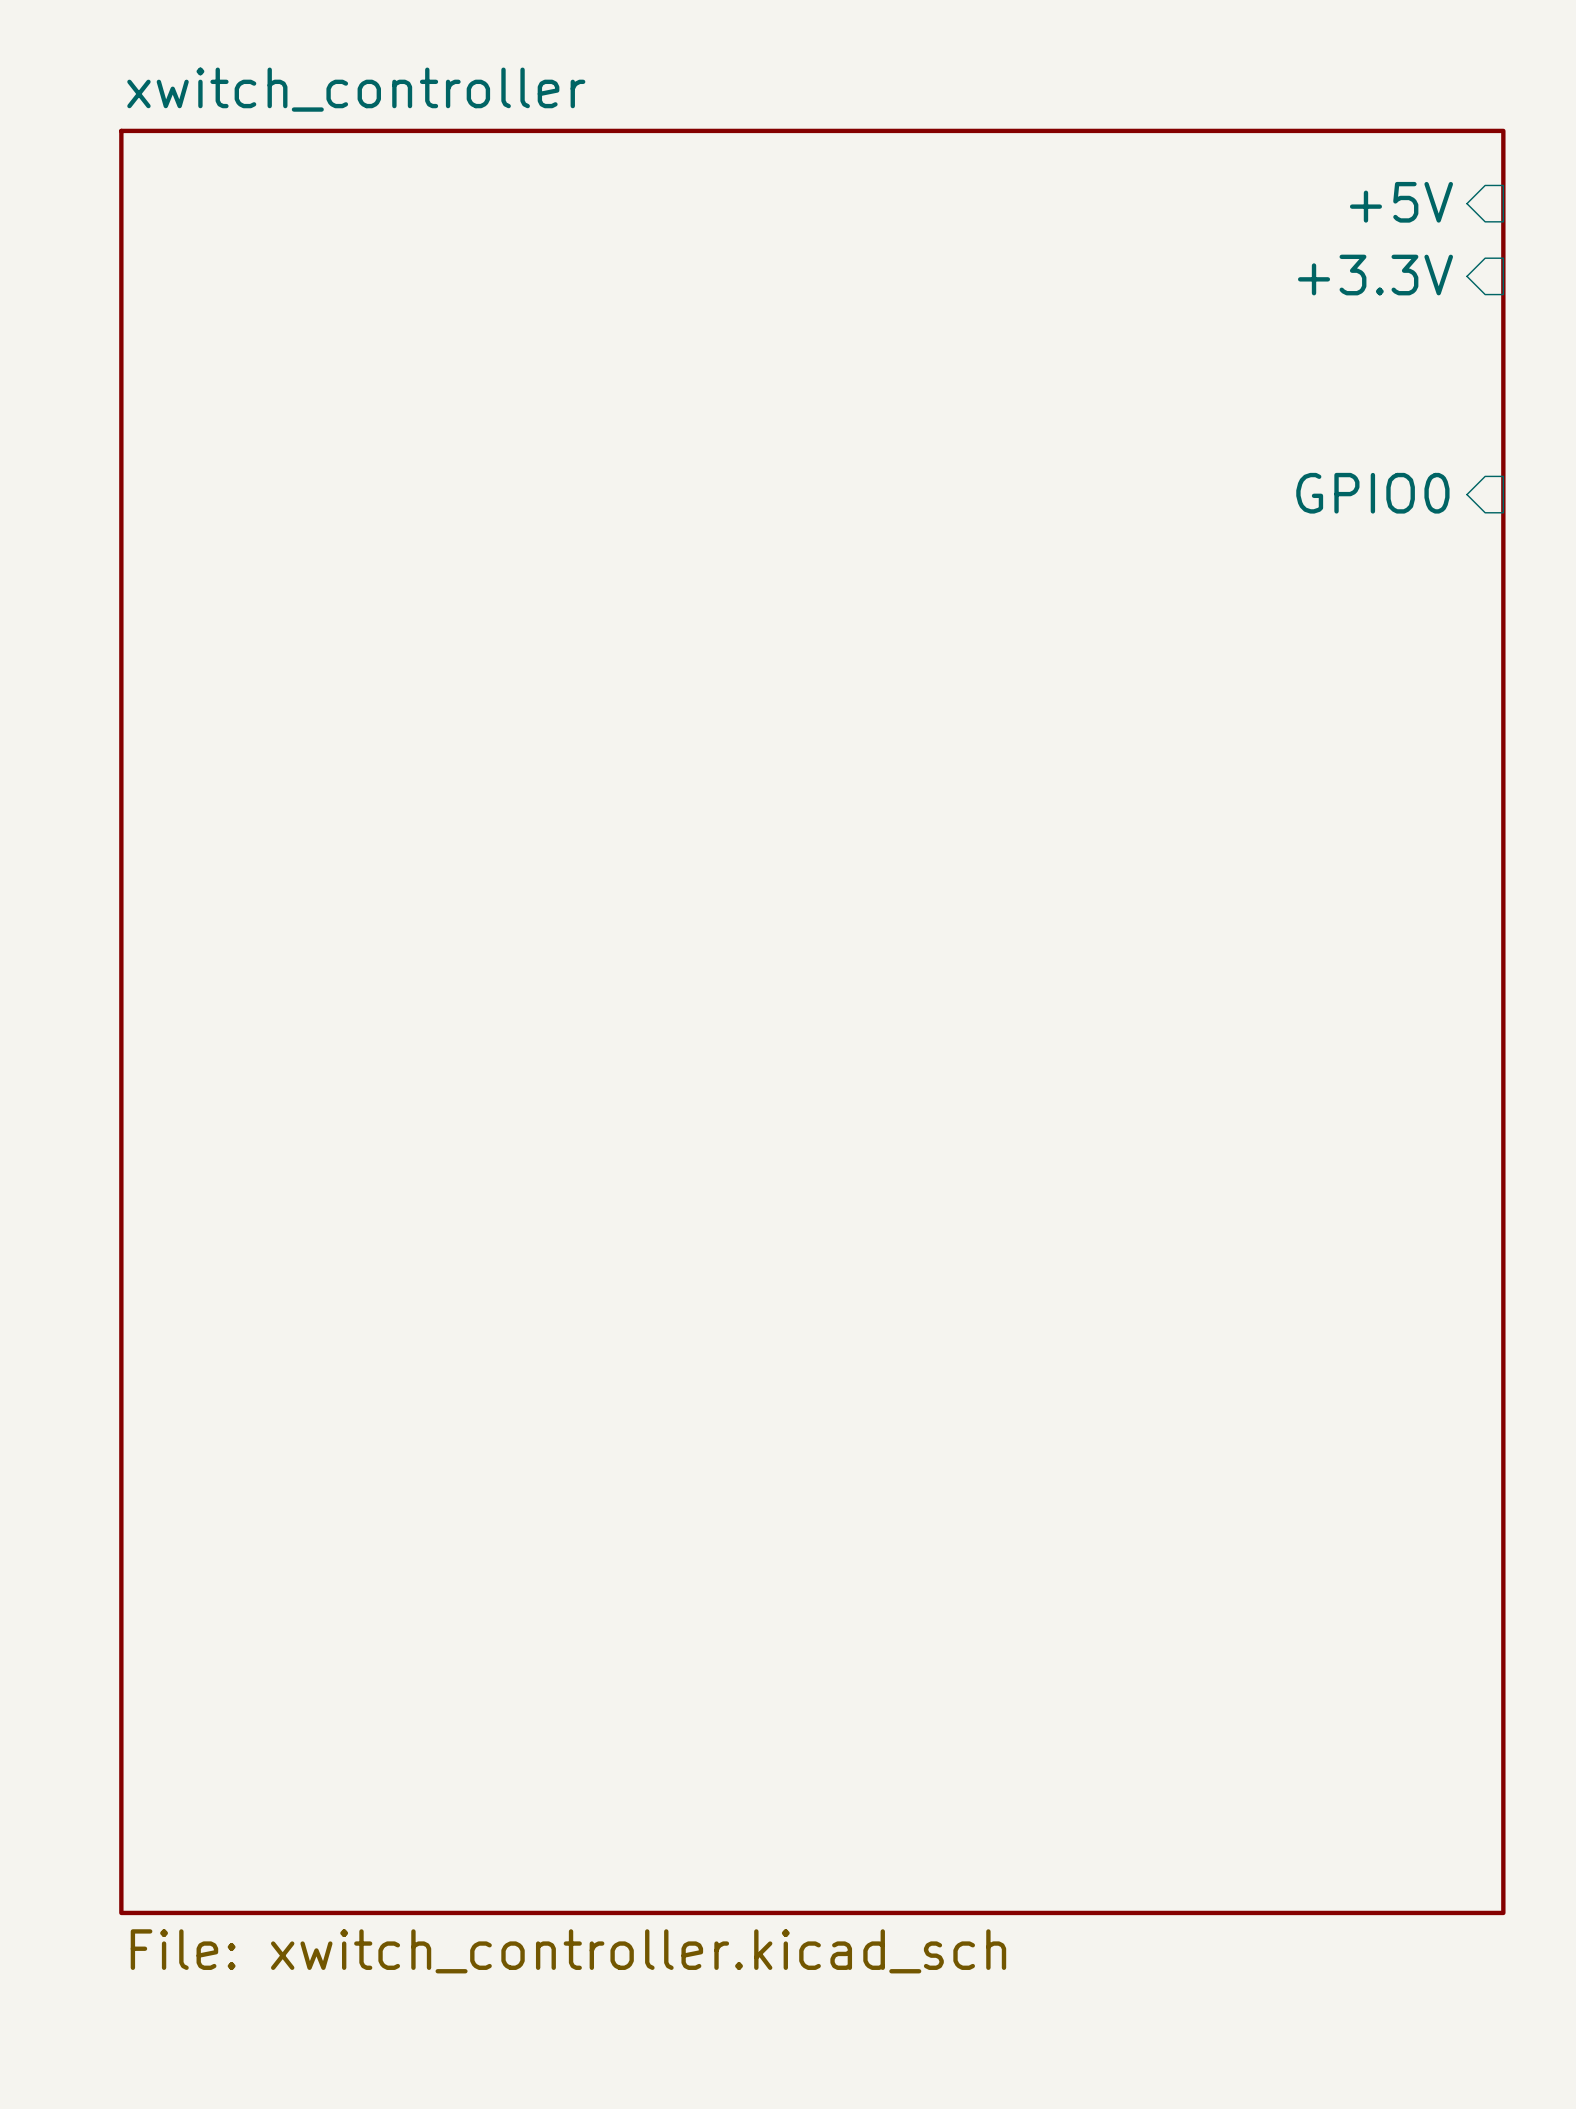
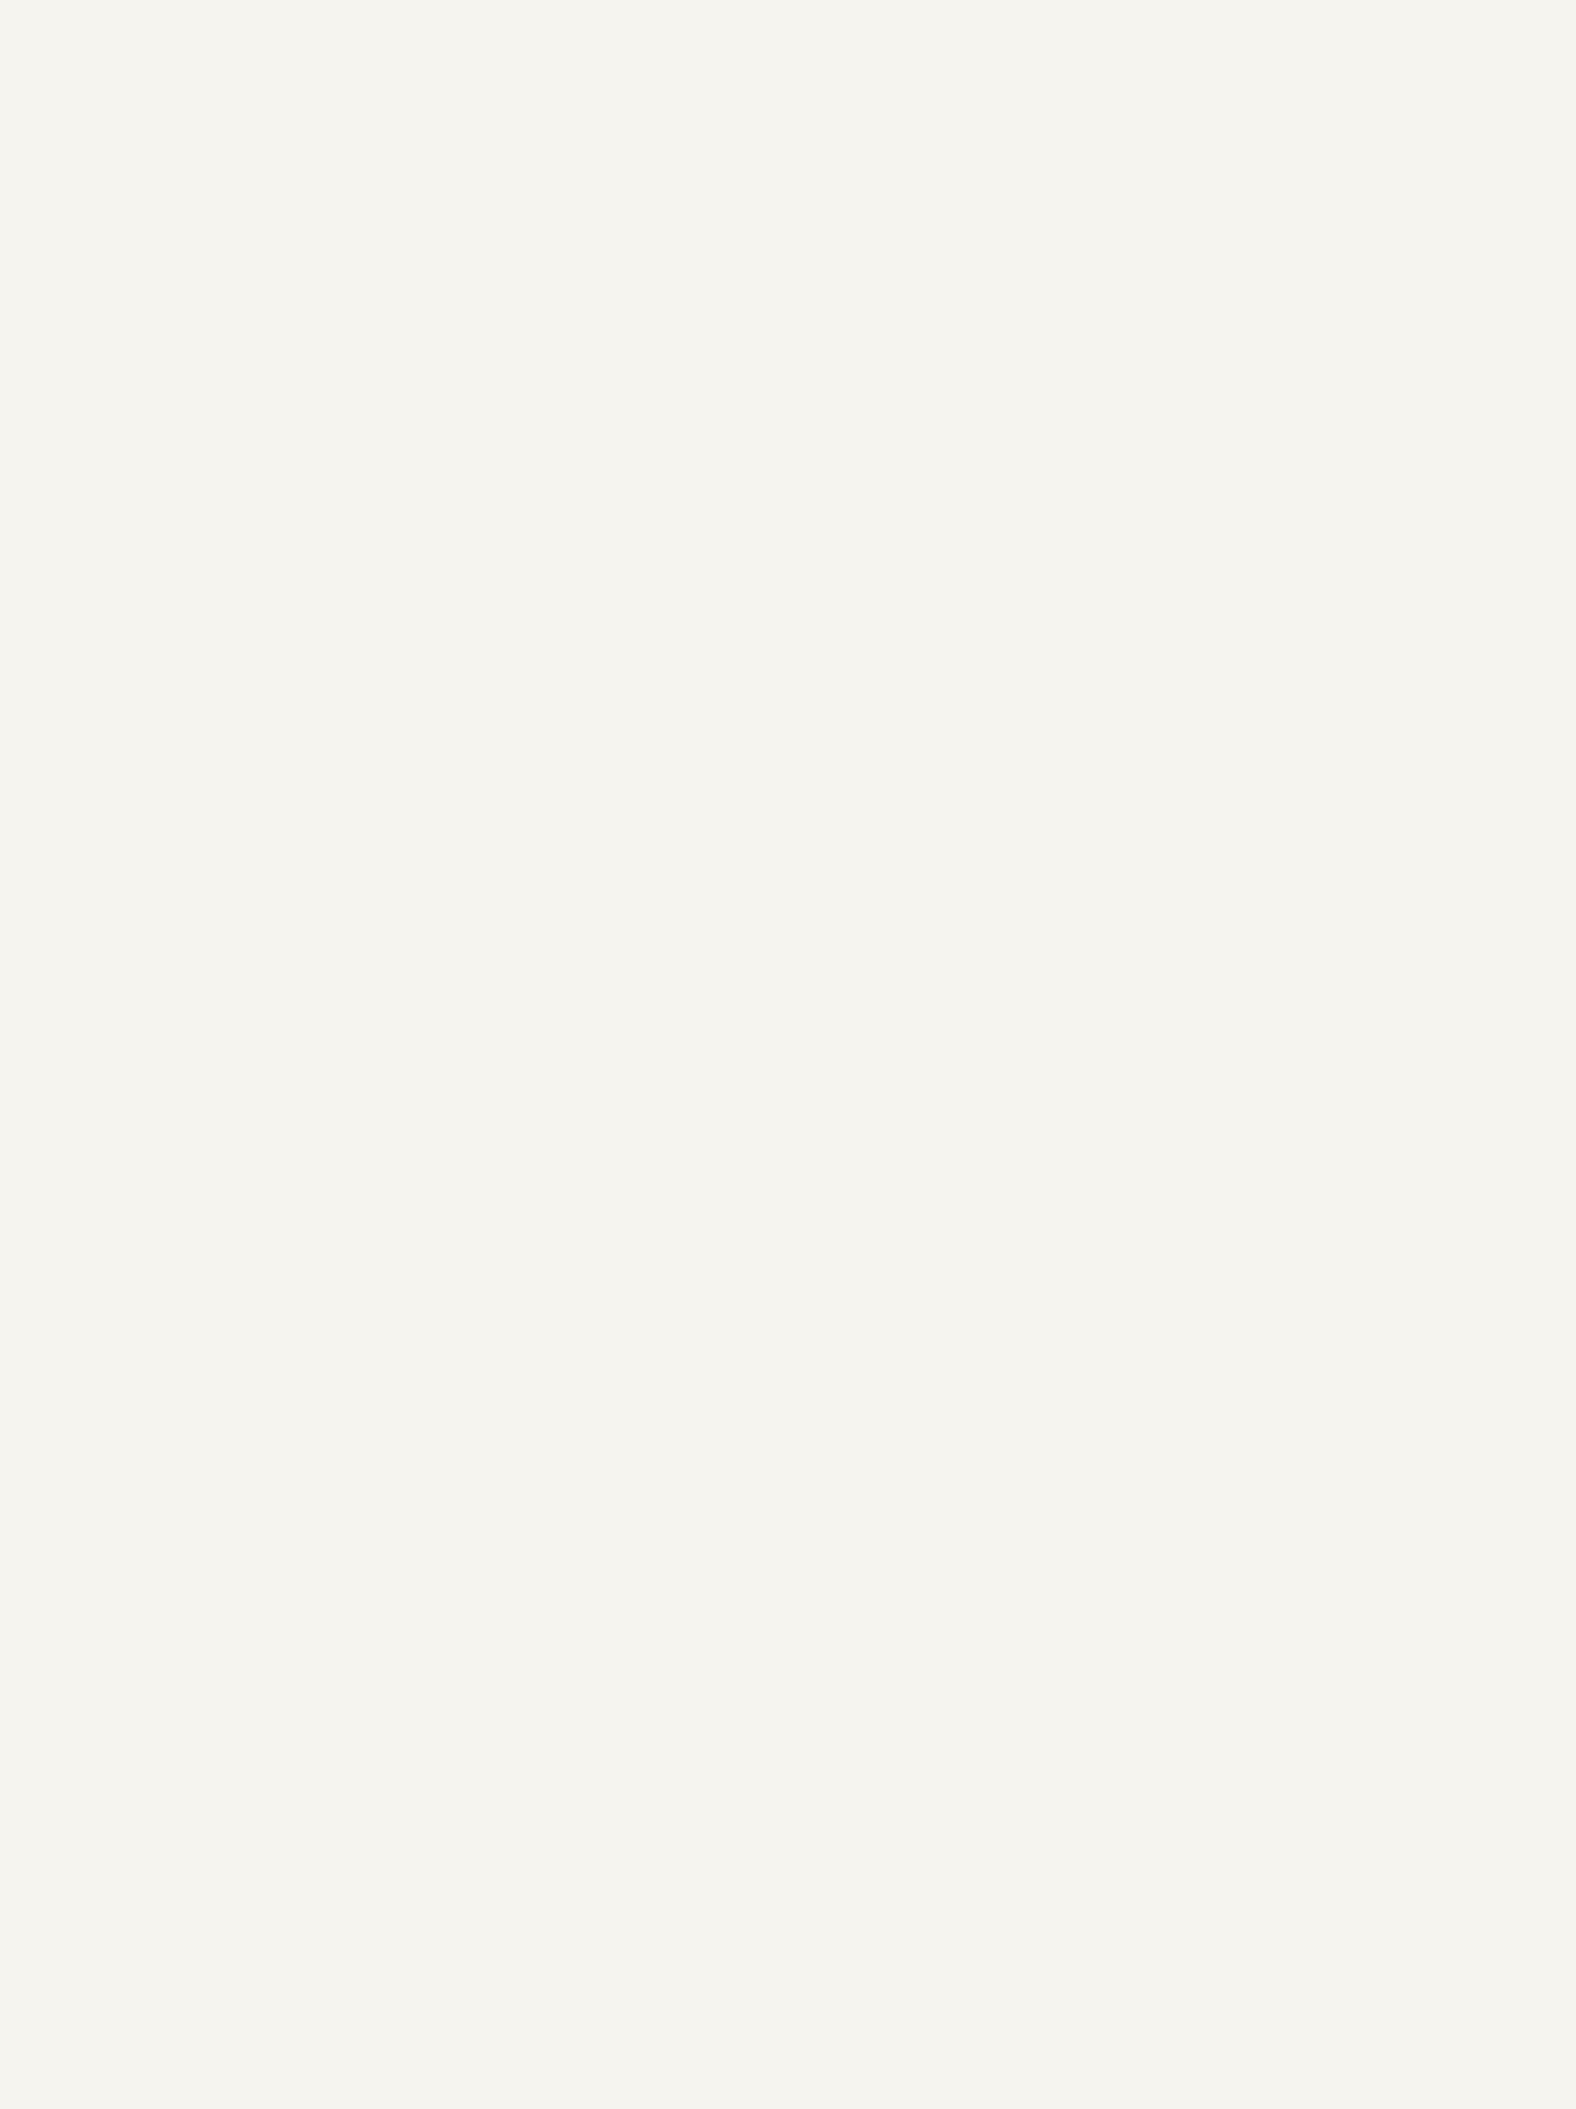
sheet pin: +5V (1401, 202) -> none
sheet pin: +3.3V (1375, 275) -> none
sheet pin: GPIO0 (1372, 493) -> none
sheet xwitch_controller: File: xwitch_controller.kicad_sch (812, 1021) -> none

